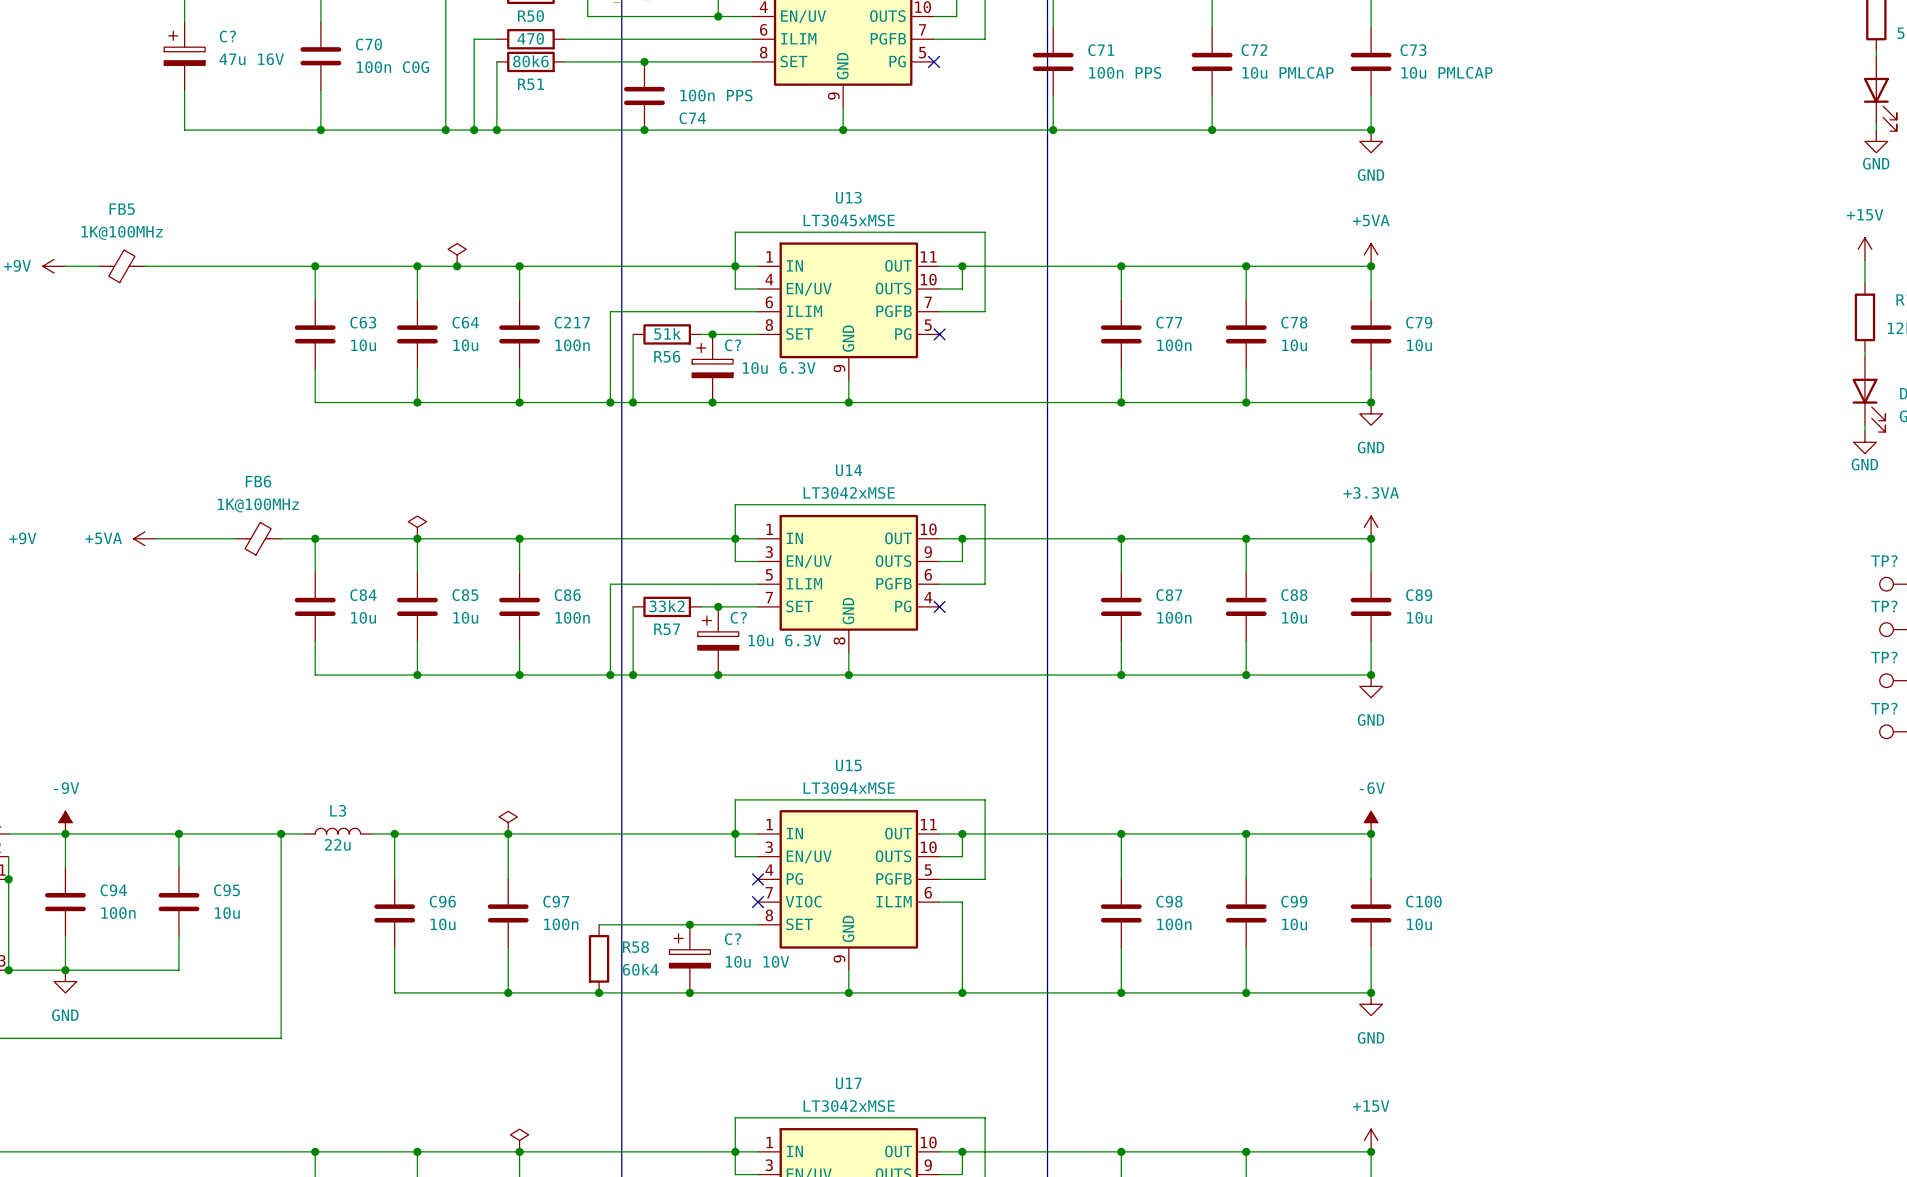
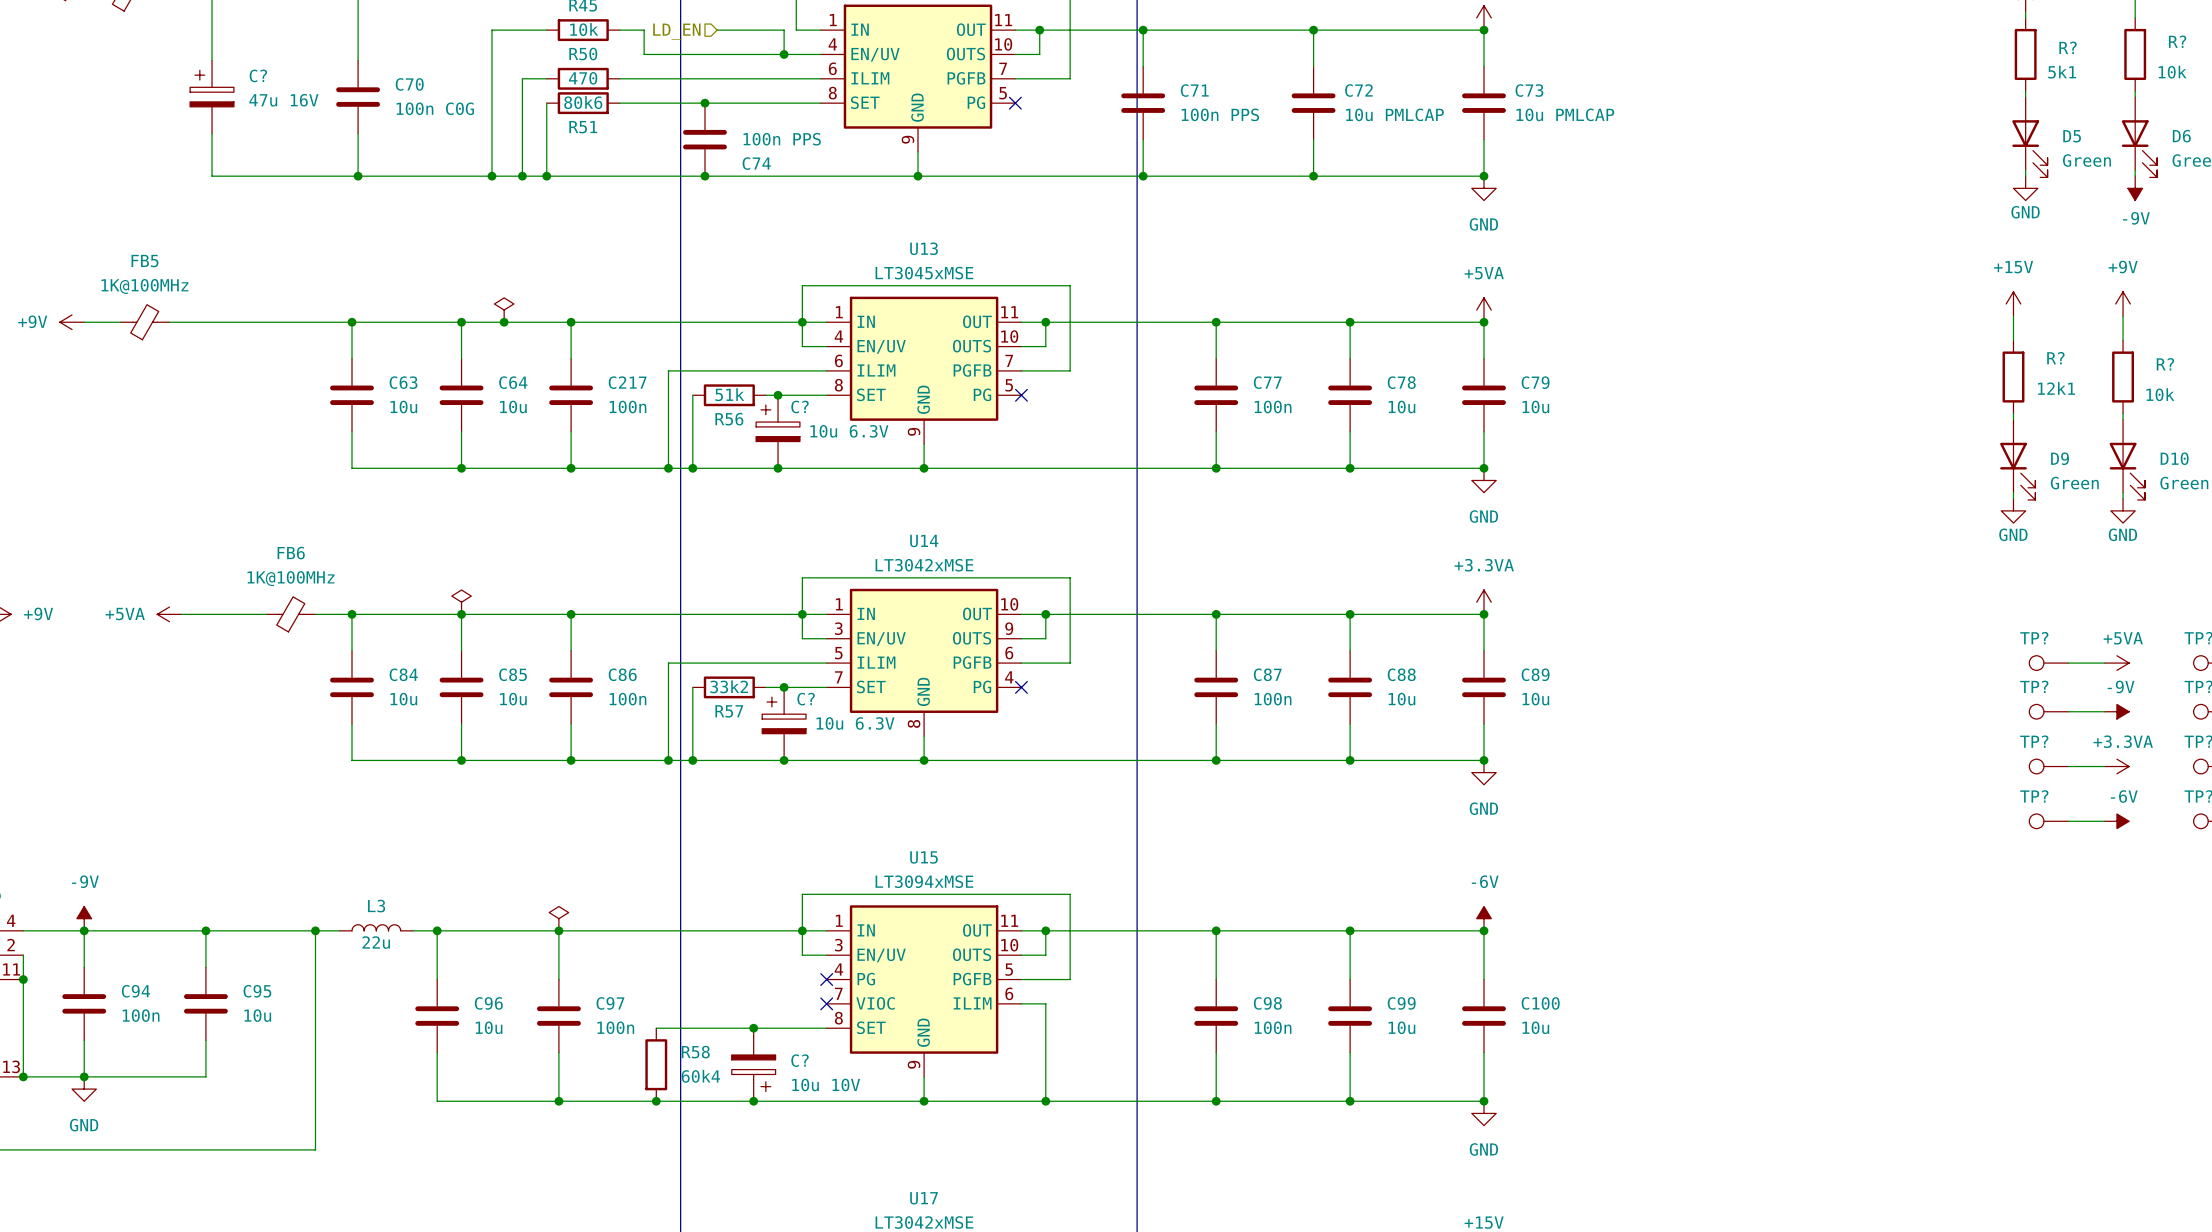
C? rotation: 0° (689, 950) -> 180° (753, 1073)

